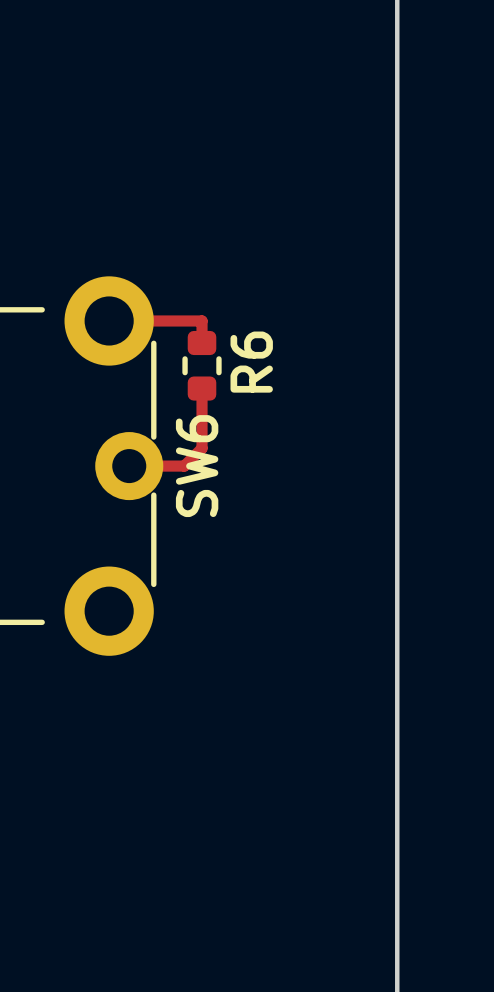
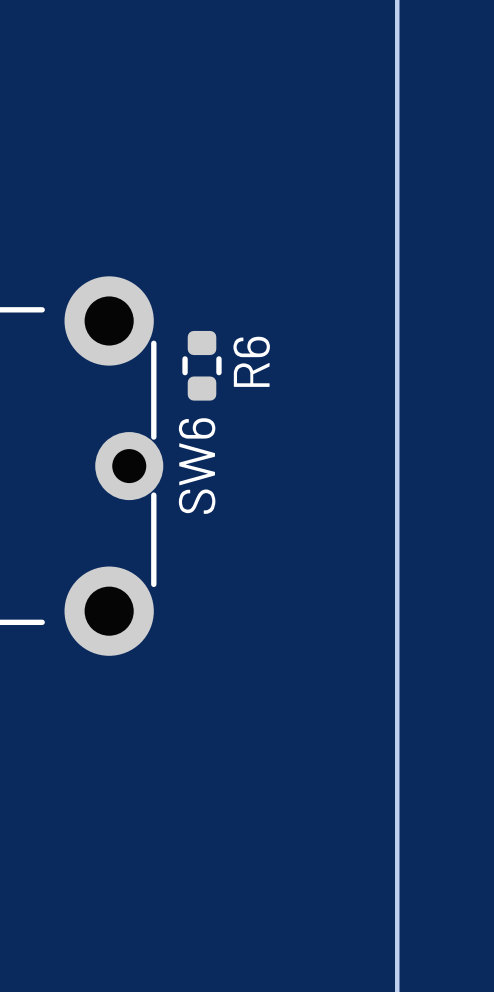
track: (109, 320) (202, 320) (202, 342) -> none
track: (202, 388) (202, 448) (184, 466) (129, 466) -> none

